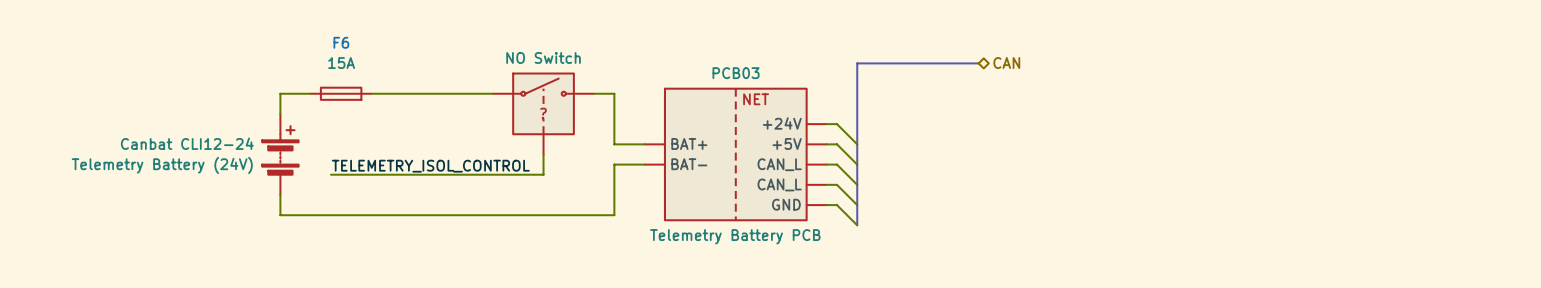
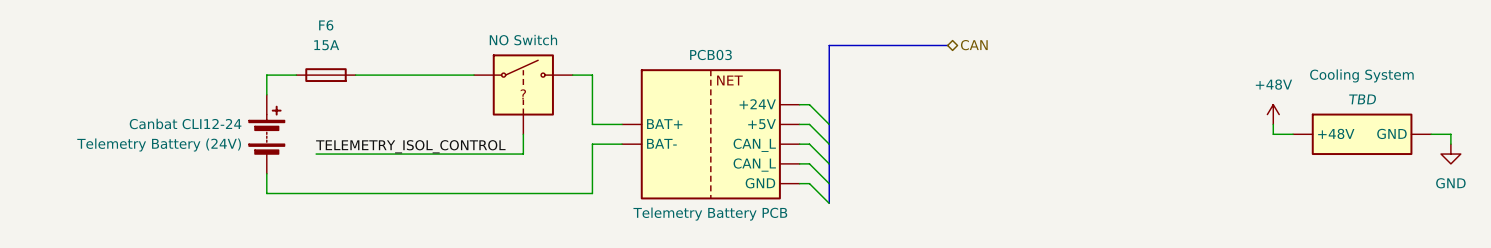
power symbol: none -> +48V (1273, 114)
wire: none -> (1273, 124) (1273, 134) (1293, 134)
part: none -> (1362, 134)
wire: none -> (1431, 134) (1450, 134) (1450, 144)
power symbol: none -> GND (1450, 154)

